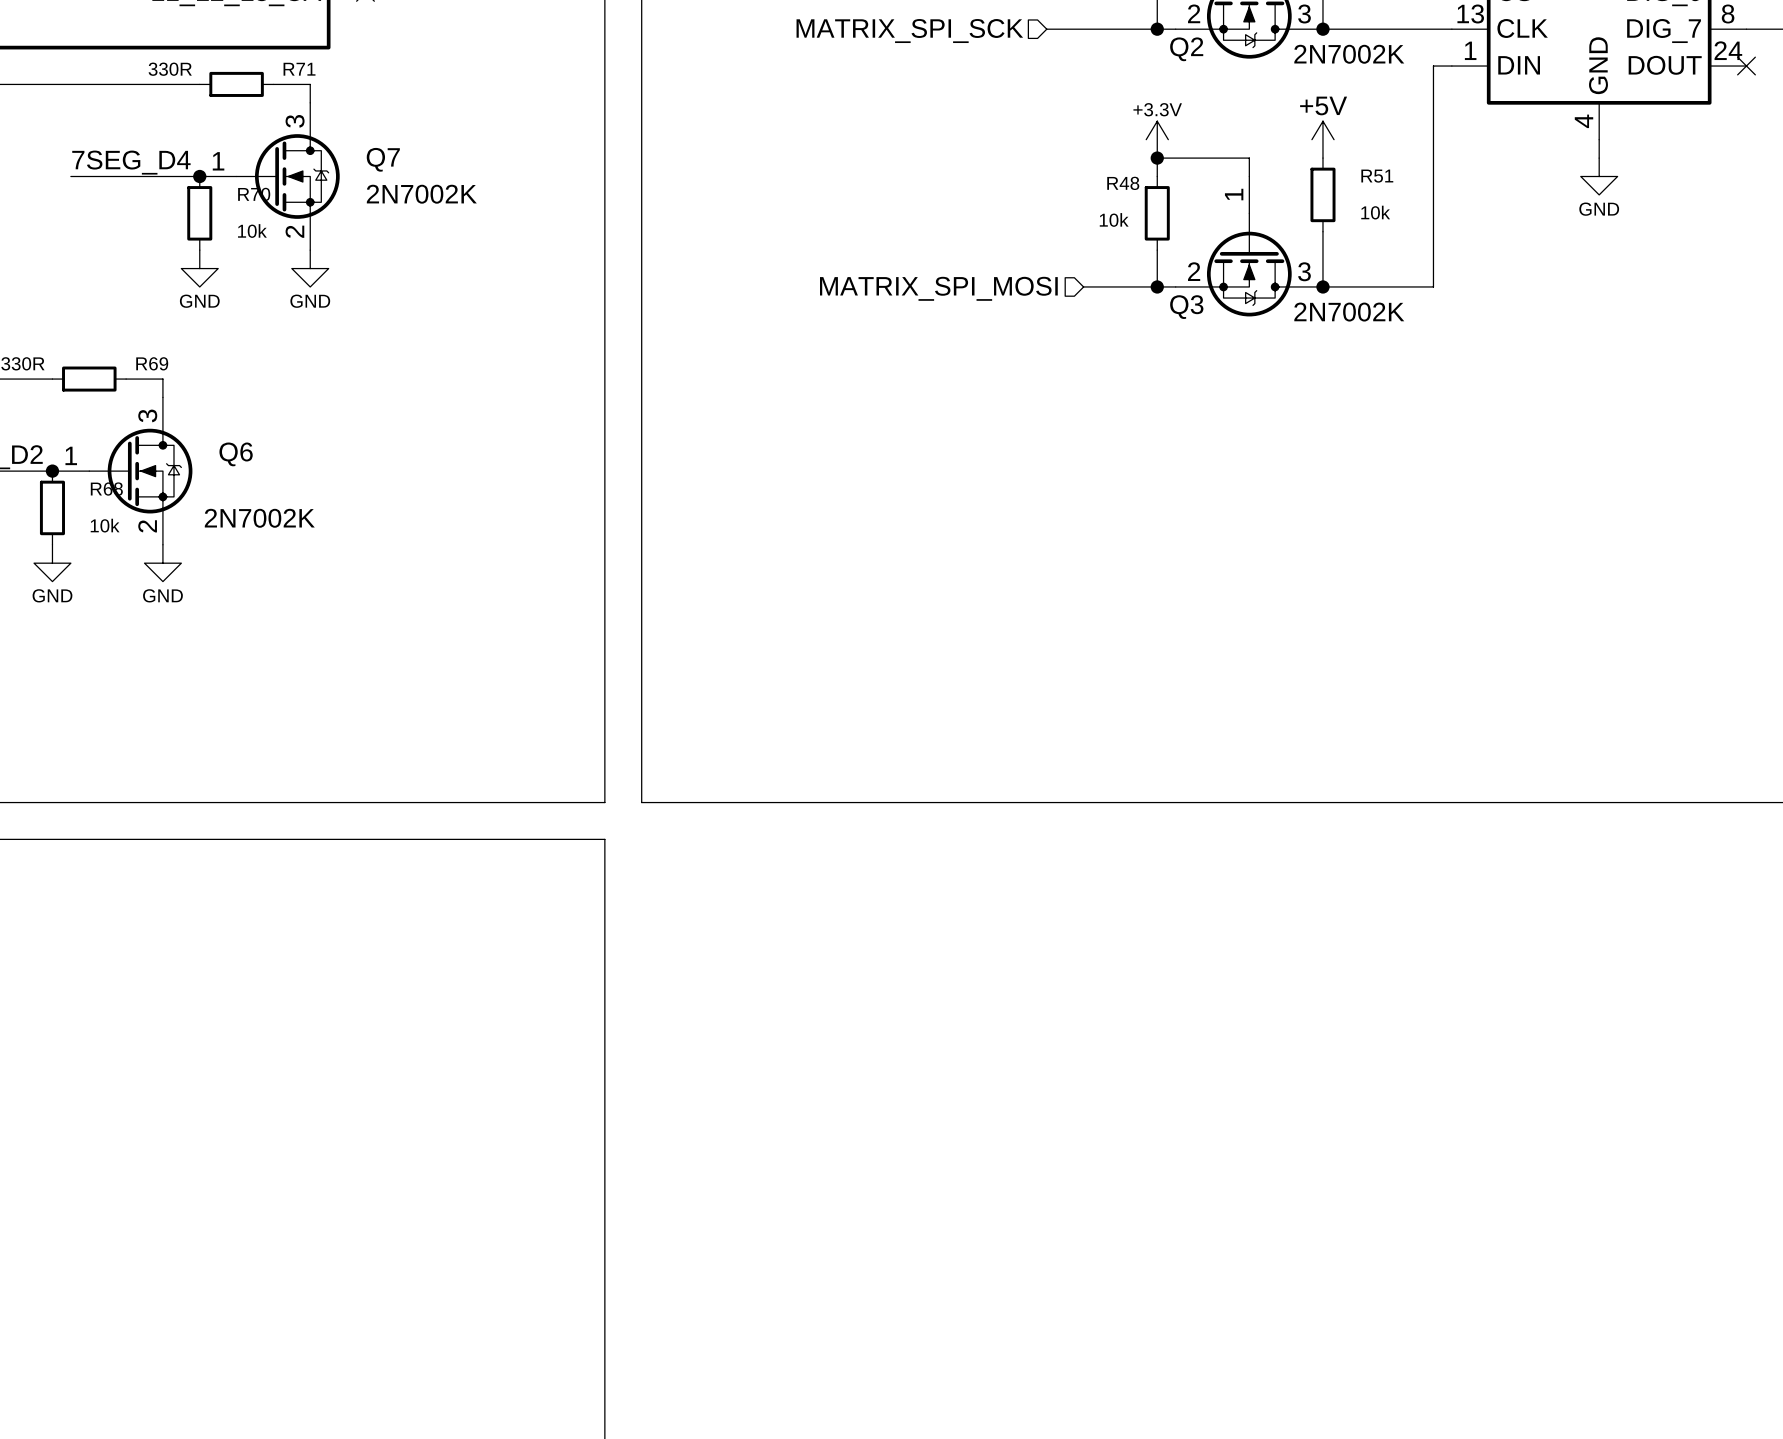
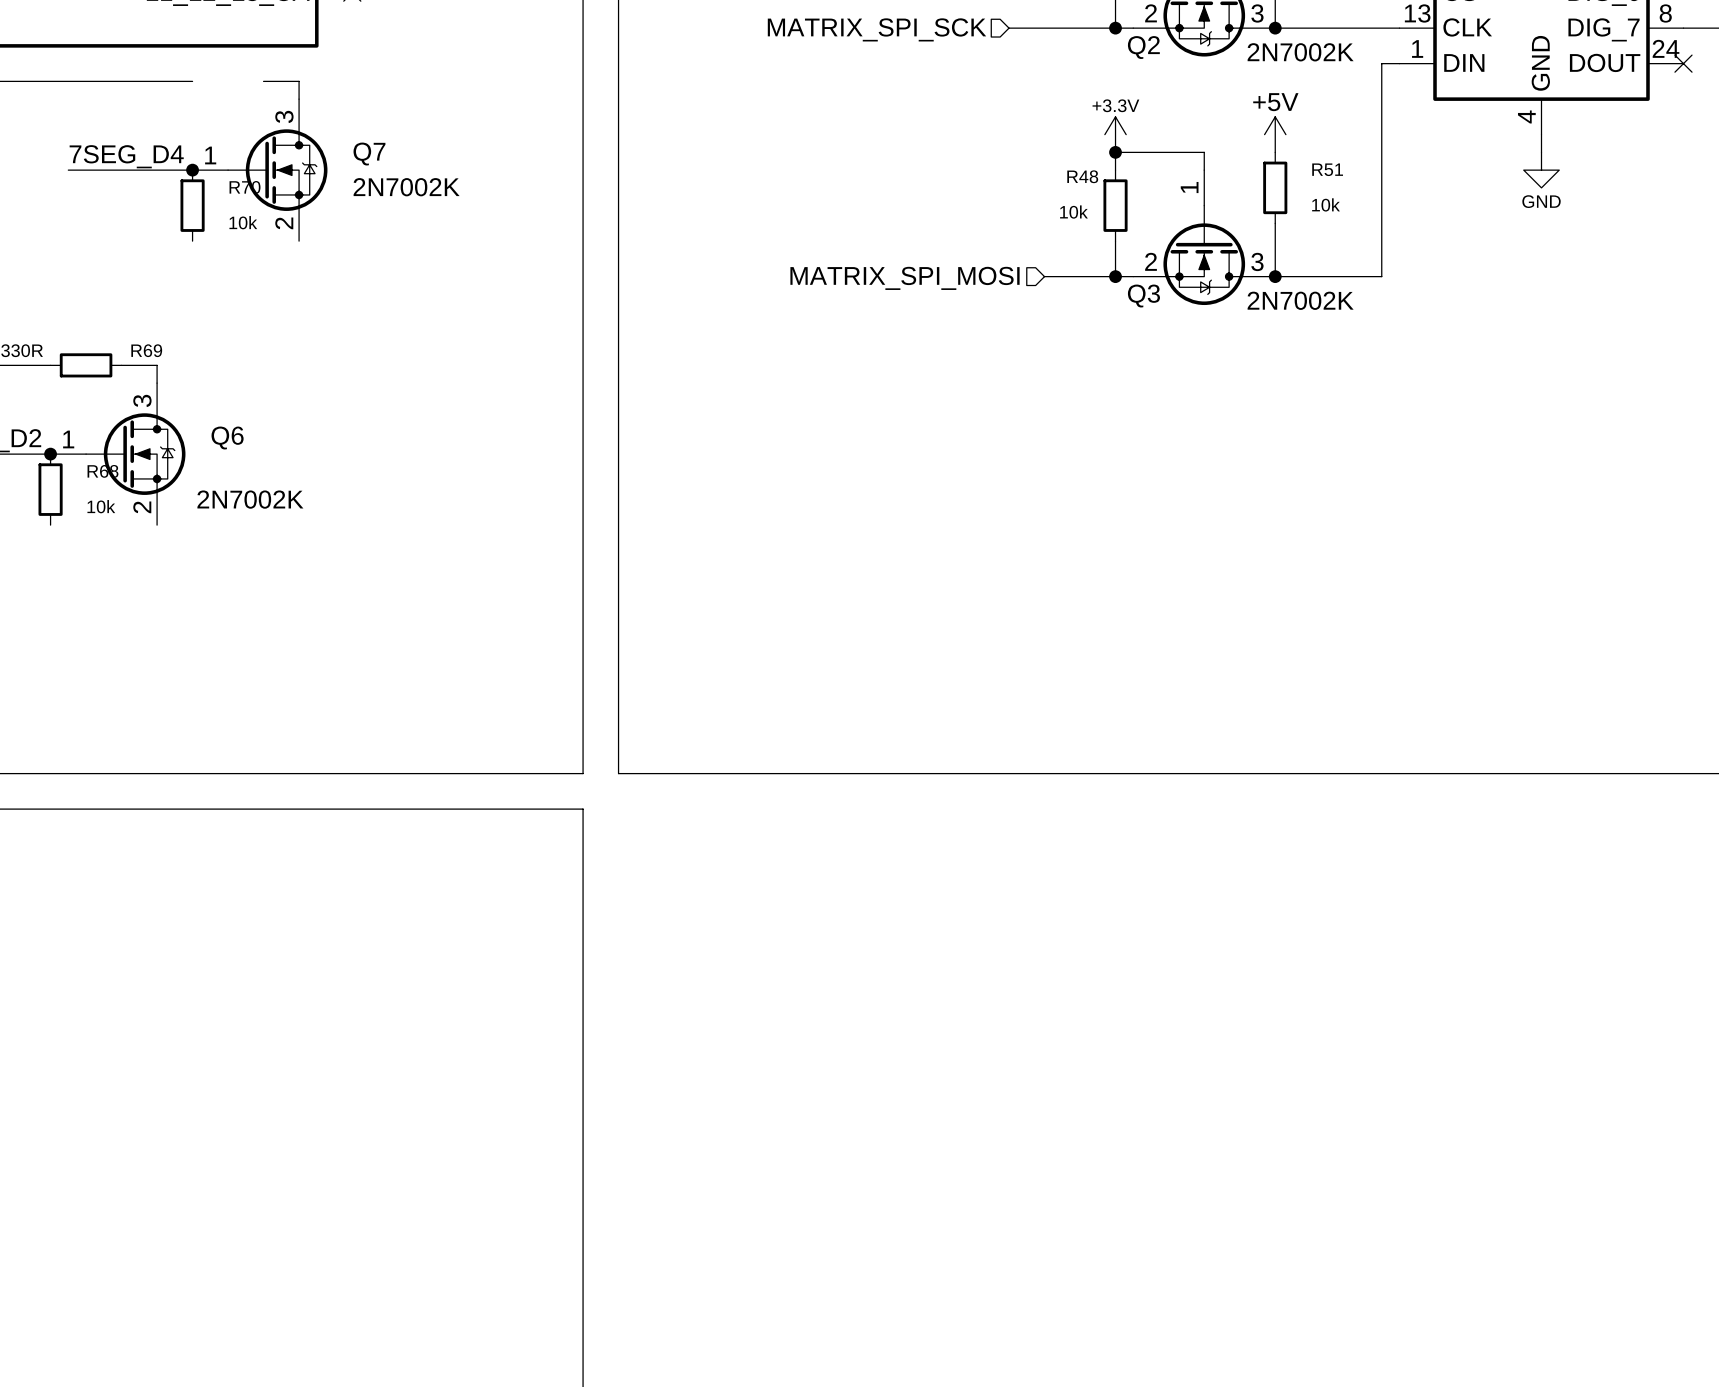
R71: 330R (236, 84) -> none
power symbol: GND (199, 268) -> none
power symbol: GND (310, 268) -> none
power symbol: GND (52, 563) -> none
power symbol: GND (162, 563) -> none

